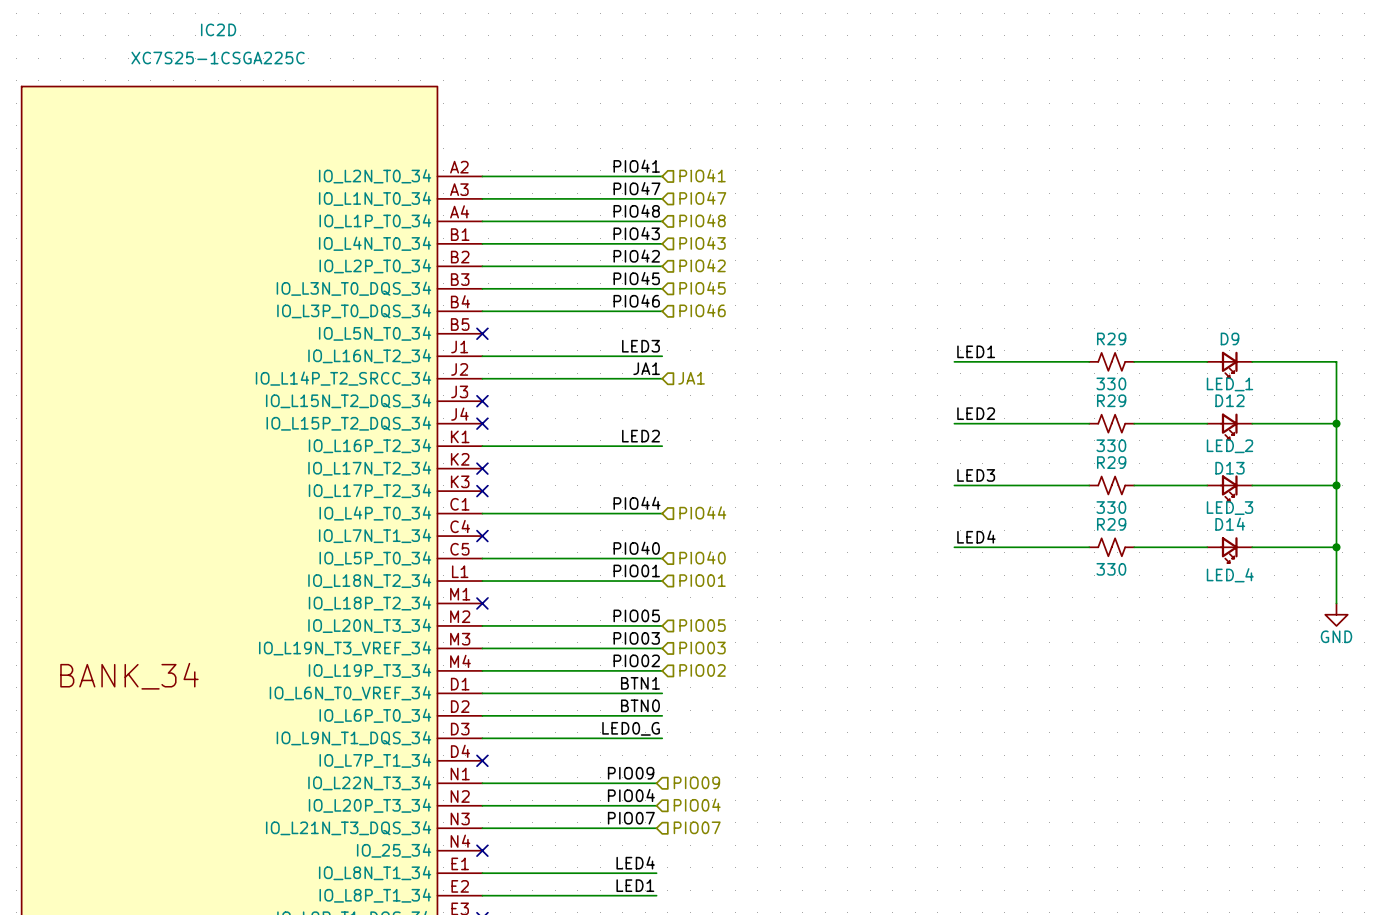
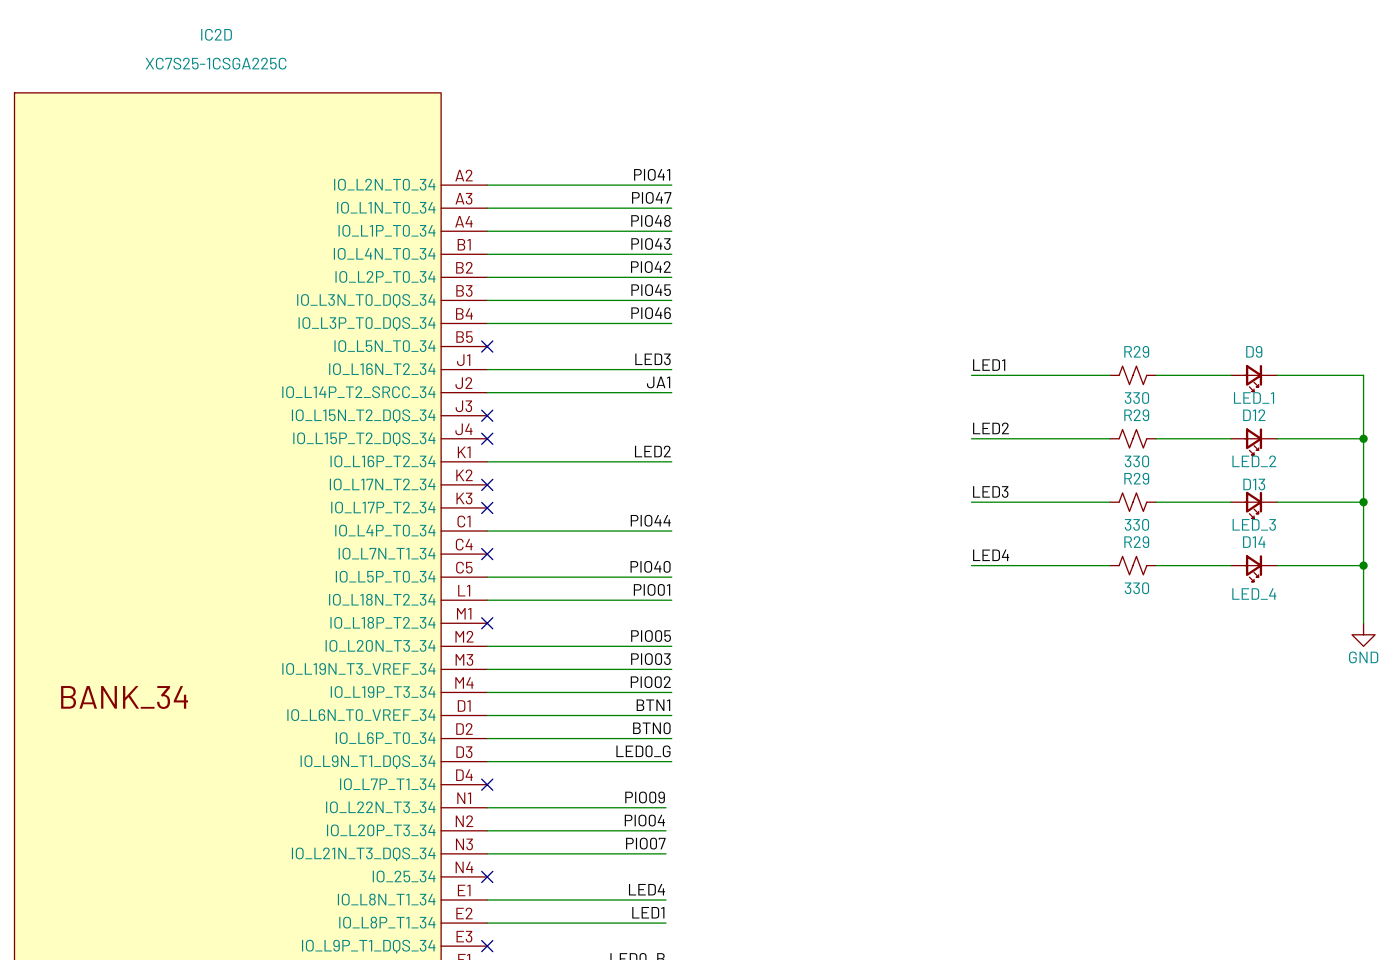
hierarchical label: PIO41 (702, 175) -> none
hierarchical label: PIO47 (702, 198) -> none
hierarchical label: PIO48 (702, 220) -> none
hierarchical label: PIO43 (702, 243) -> none
hierarchical label: PIO42 (702, 265) -> none
hierarchical label: PIO45 (702, 288) -> none
hierarchical label: PIO46 (702, 310) -> none
hierarchical label: JA1 (691, 378) -> none
hierarchical label: PIO44 (702, 512) -> none
hierarchical label: PIO40 (702, 557) -> none
hierarchical label: PIO01 (702, 580) -> none
hierarchical label: PIO05 (702, 625) -> none
hierarchical label: PIO03 (702, 648) -> none
hierarchical label: PIO02 (702, 670) -> none
hierarchical label: PIO09 (696, 782) -> none
hierarchical label: PIO04 (697, 805) -> none
hierarchical label: PIO07 (697, 827) -> none

